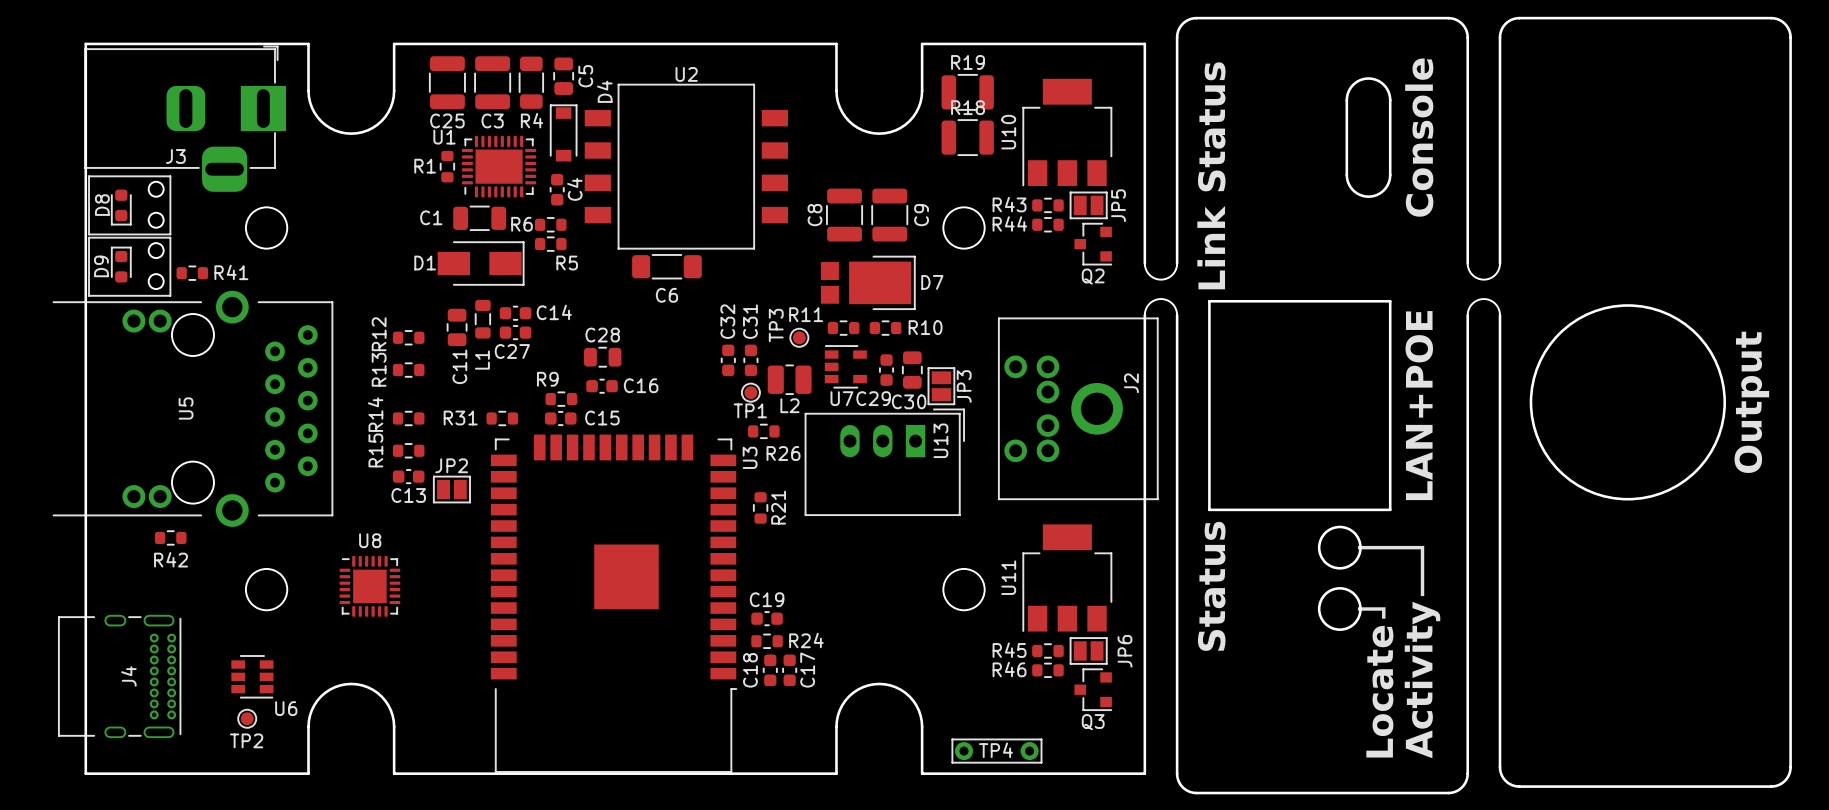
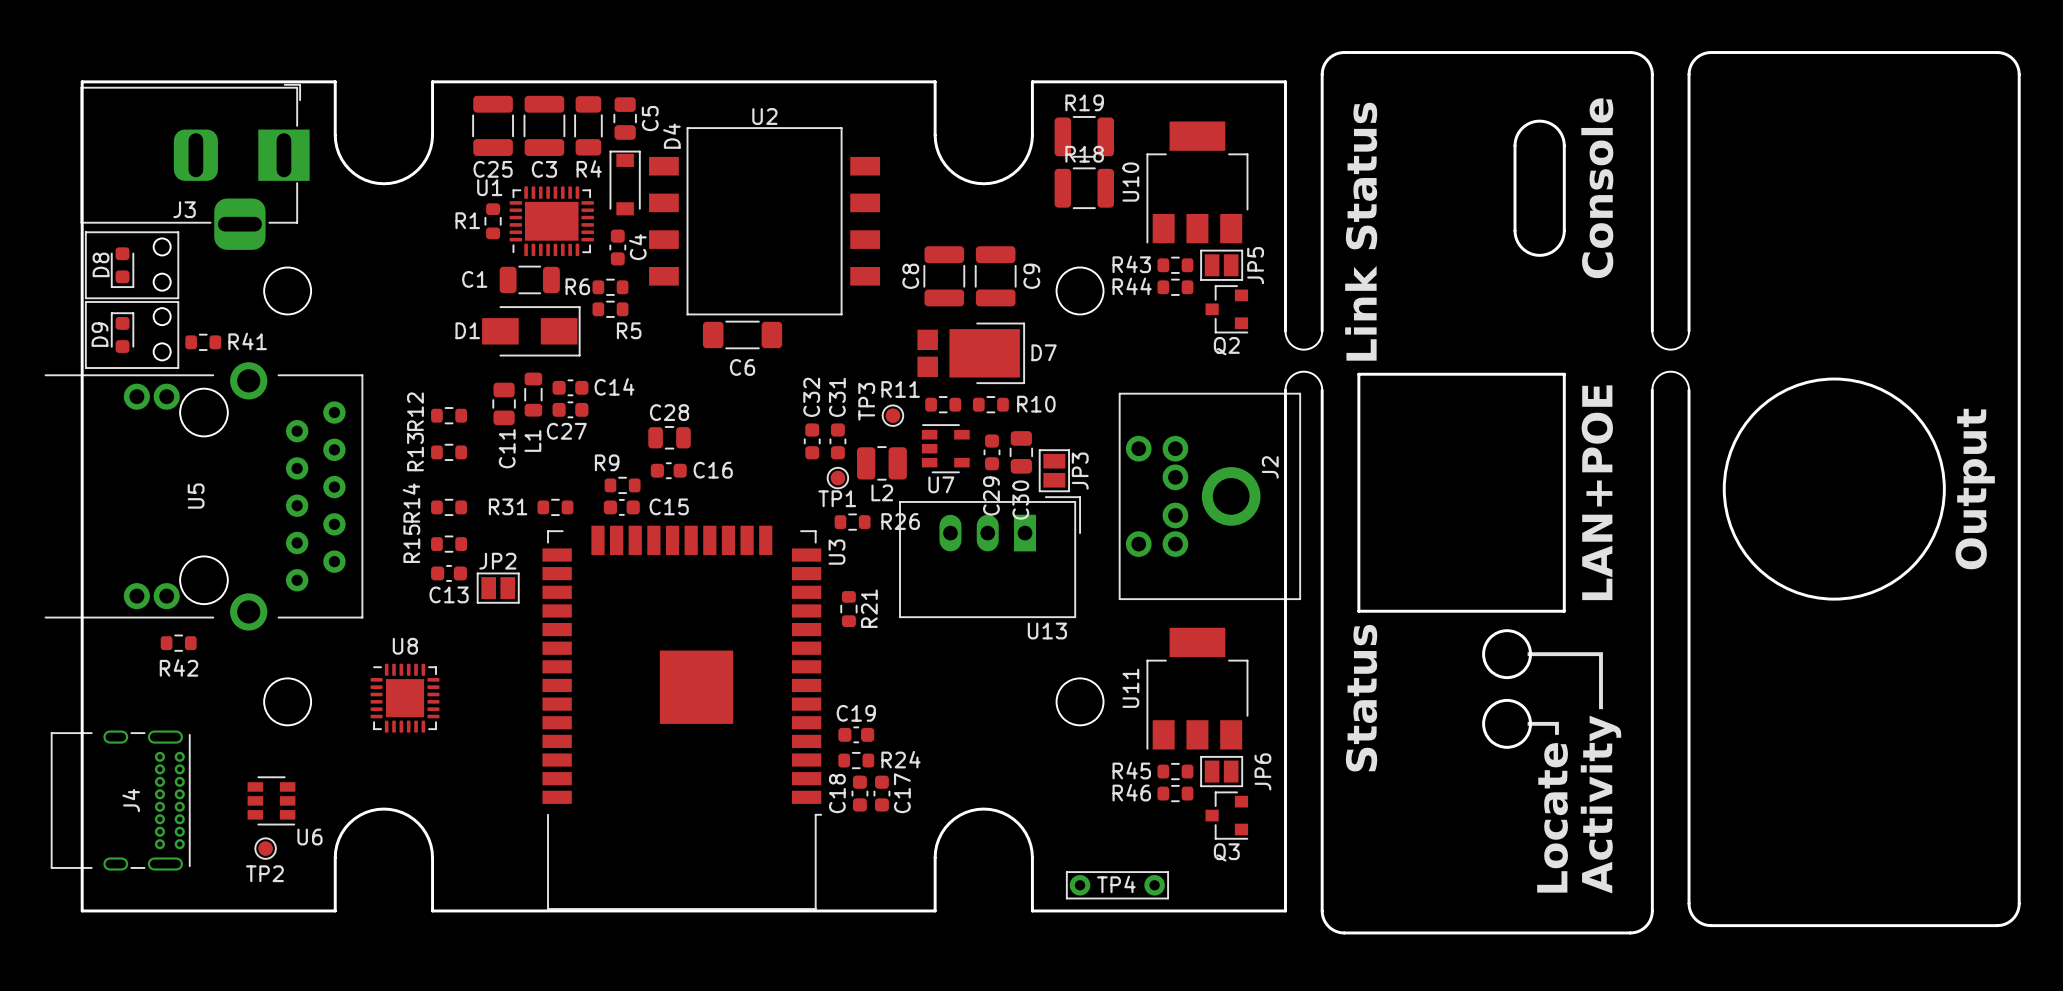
C29 name rotation: 0° (873, 398) -> 90° counterclockwise (991, 496)
C30 name rotation: 0° (909, 401) -> 90° counterclockwise (1020, 500)
U13 name rotation: 0° (940, 440) -> 90° clockwise (1047, 631)
U13 name position: U13 (940, 440) -> U13 (1047, 631)
R26 name position: R26 (783, 453) -> R26 (900, 521)

